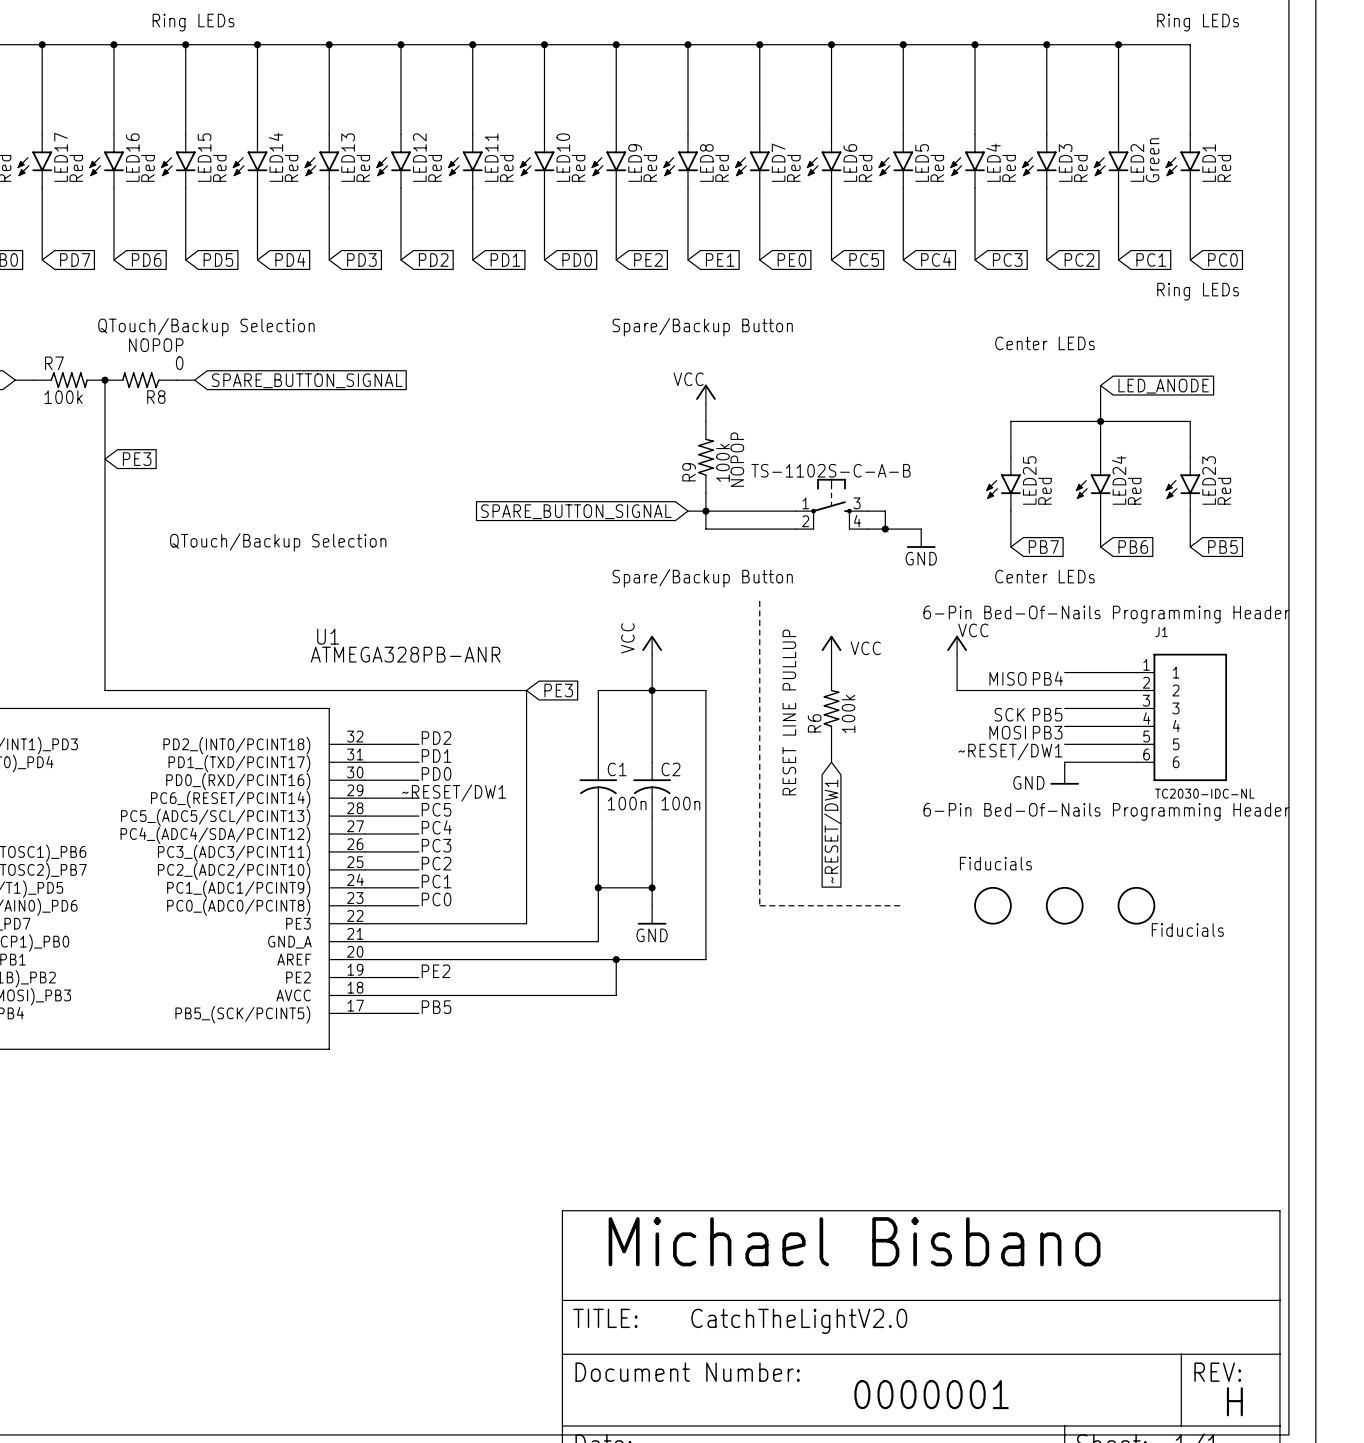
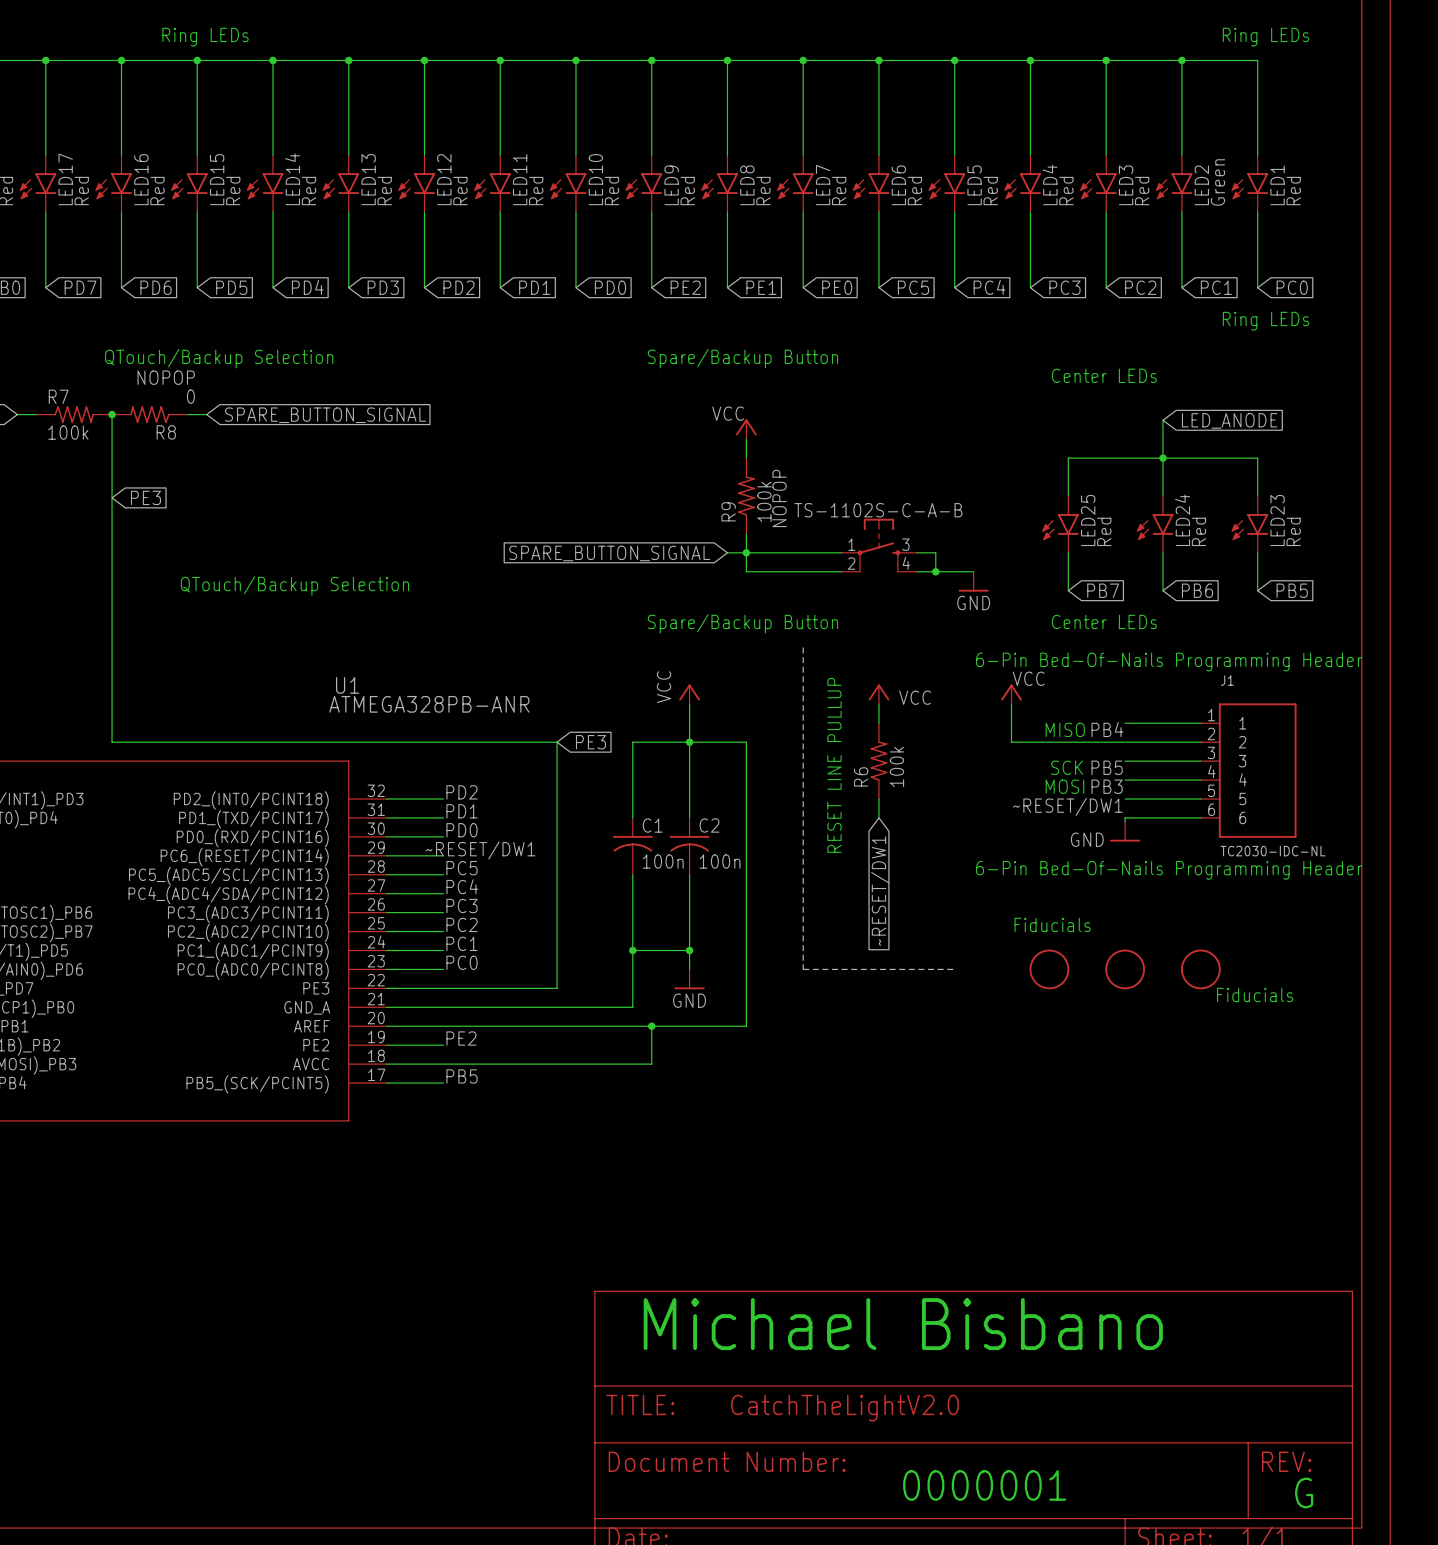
text: H (1234, 1401) -> G (1304, 1493)

